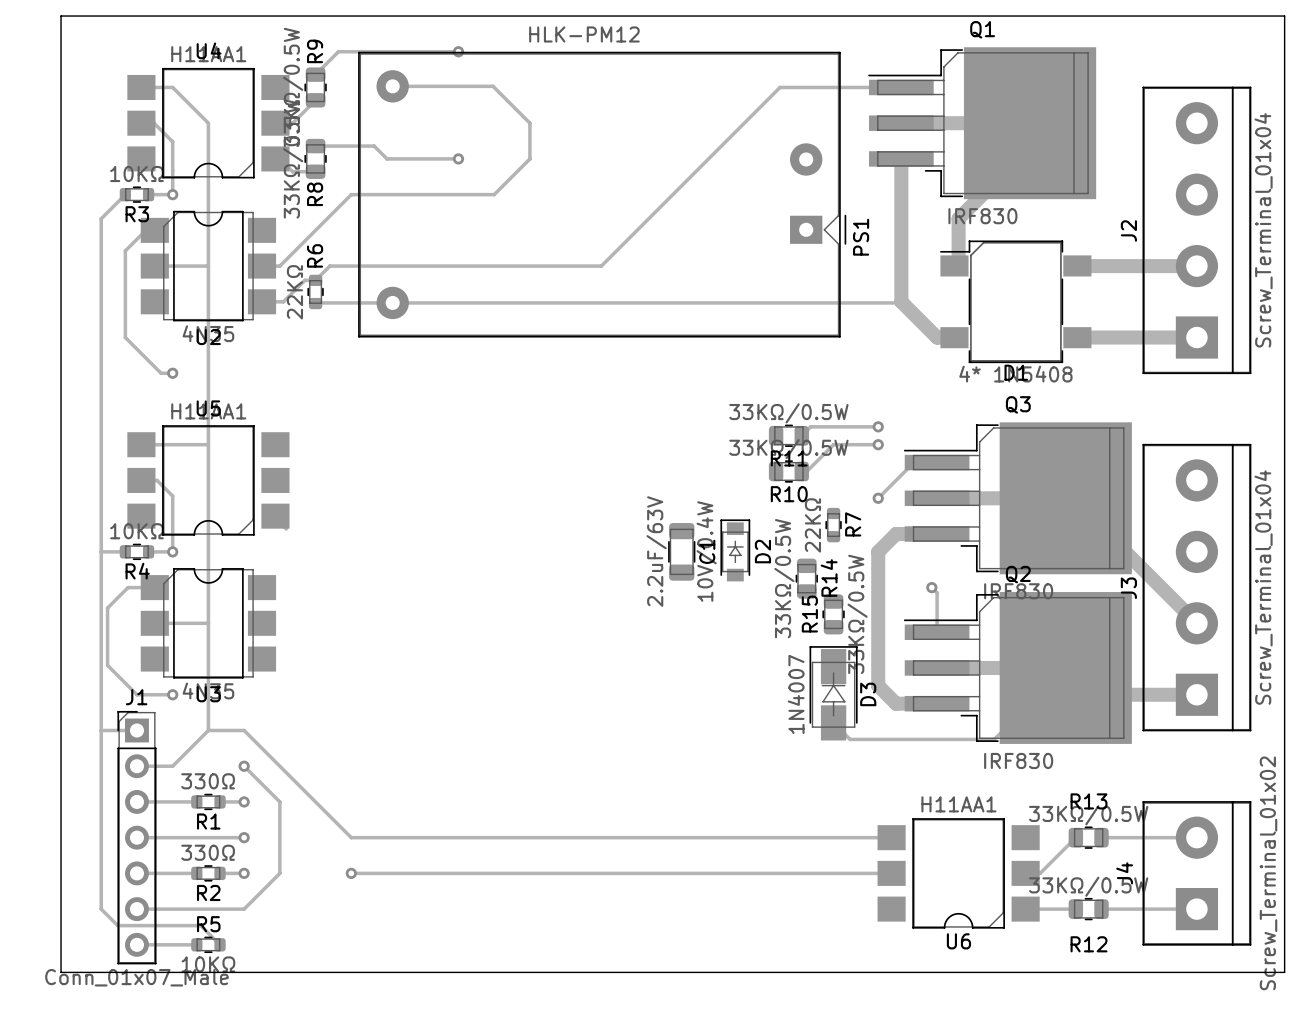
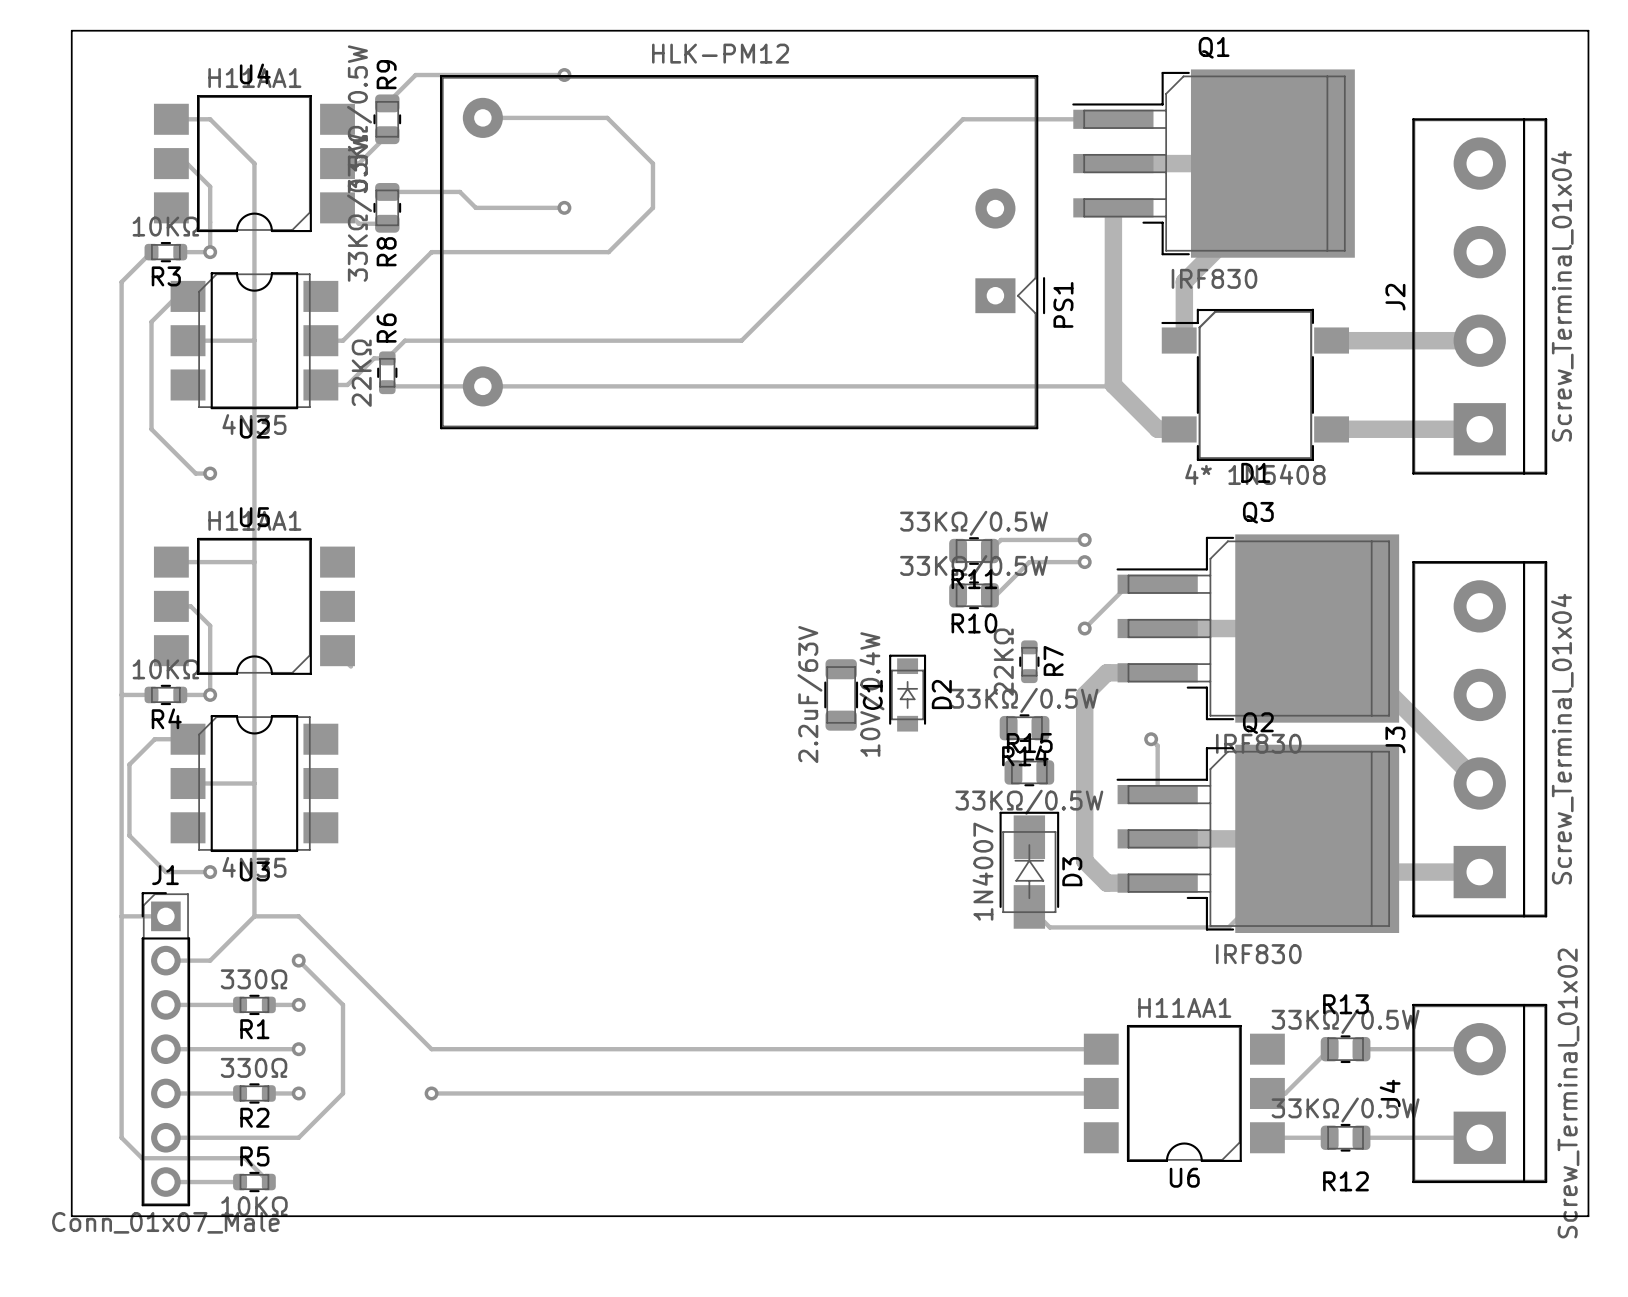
R14 rotation: 0° (806, 578) -> 90° clockwise (1024, 728)
R15 rotation: 0° (833, 614) -> 90° clockwise (1029, 772)

